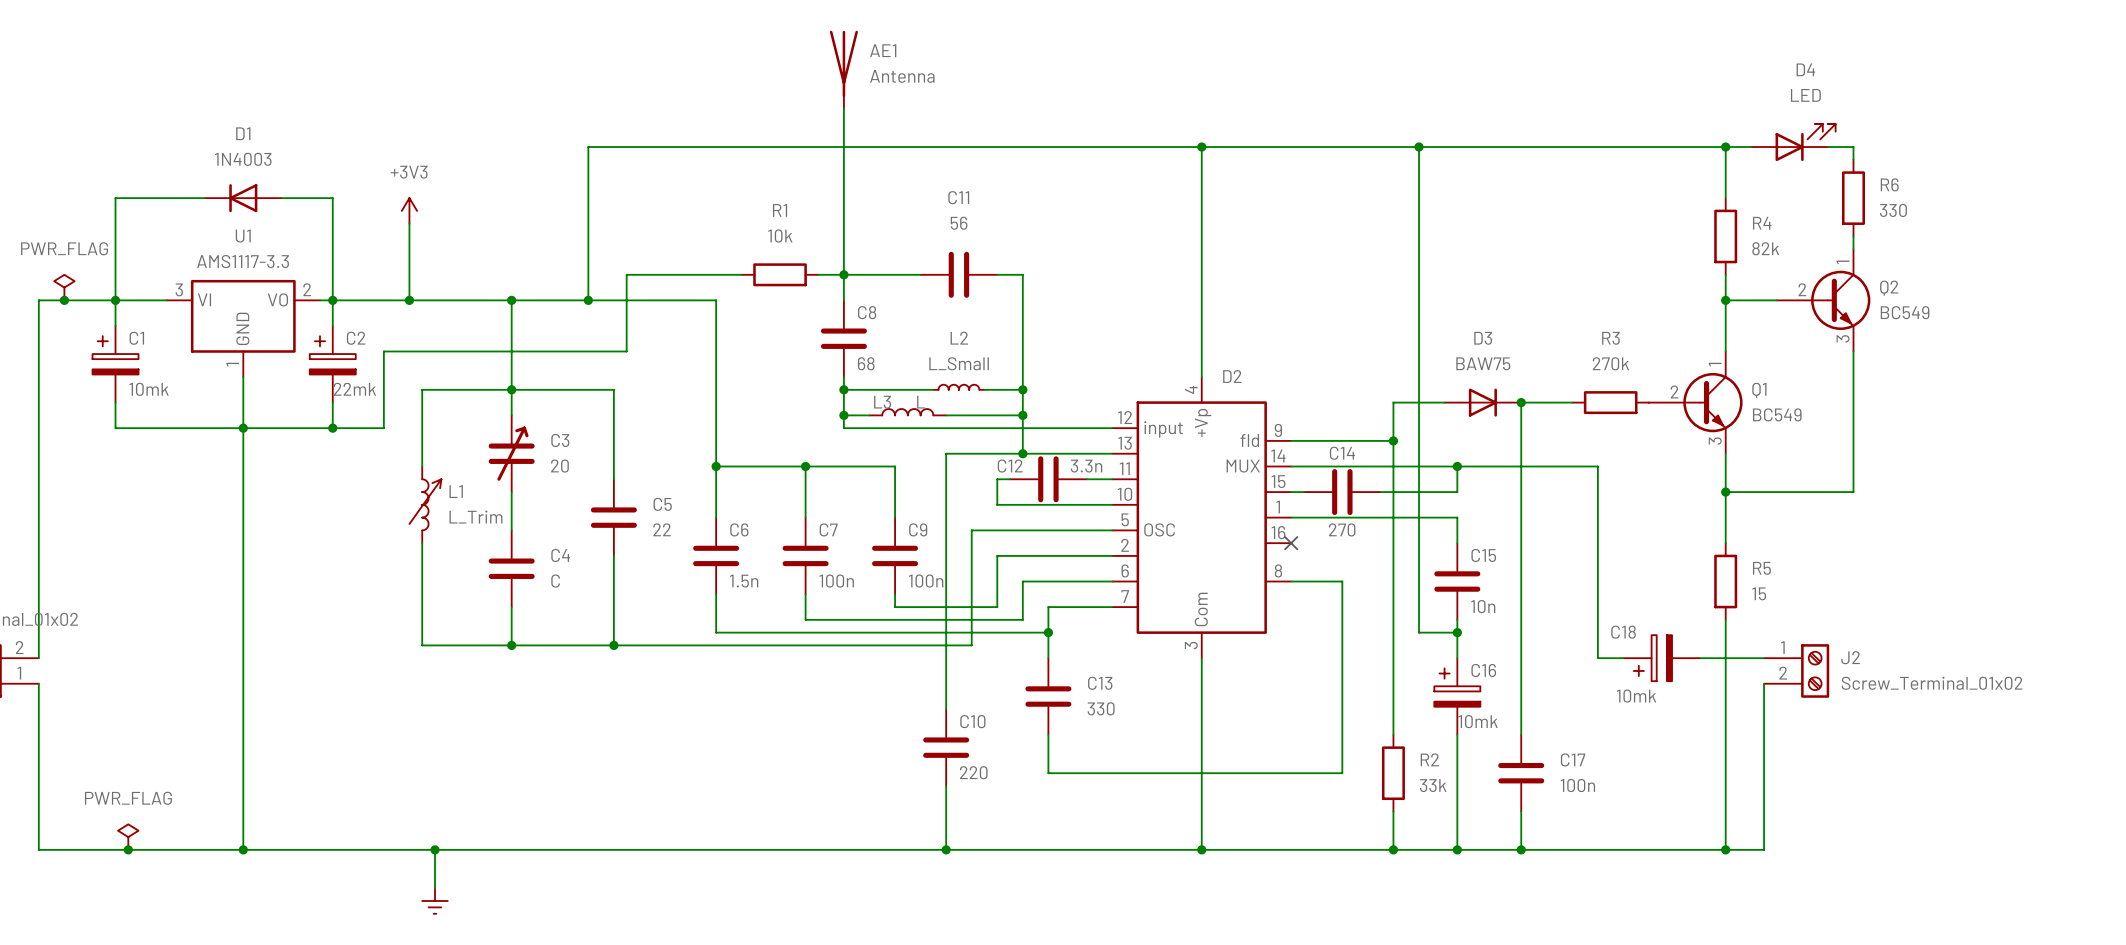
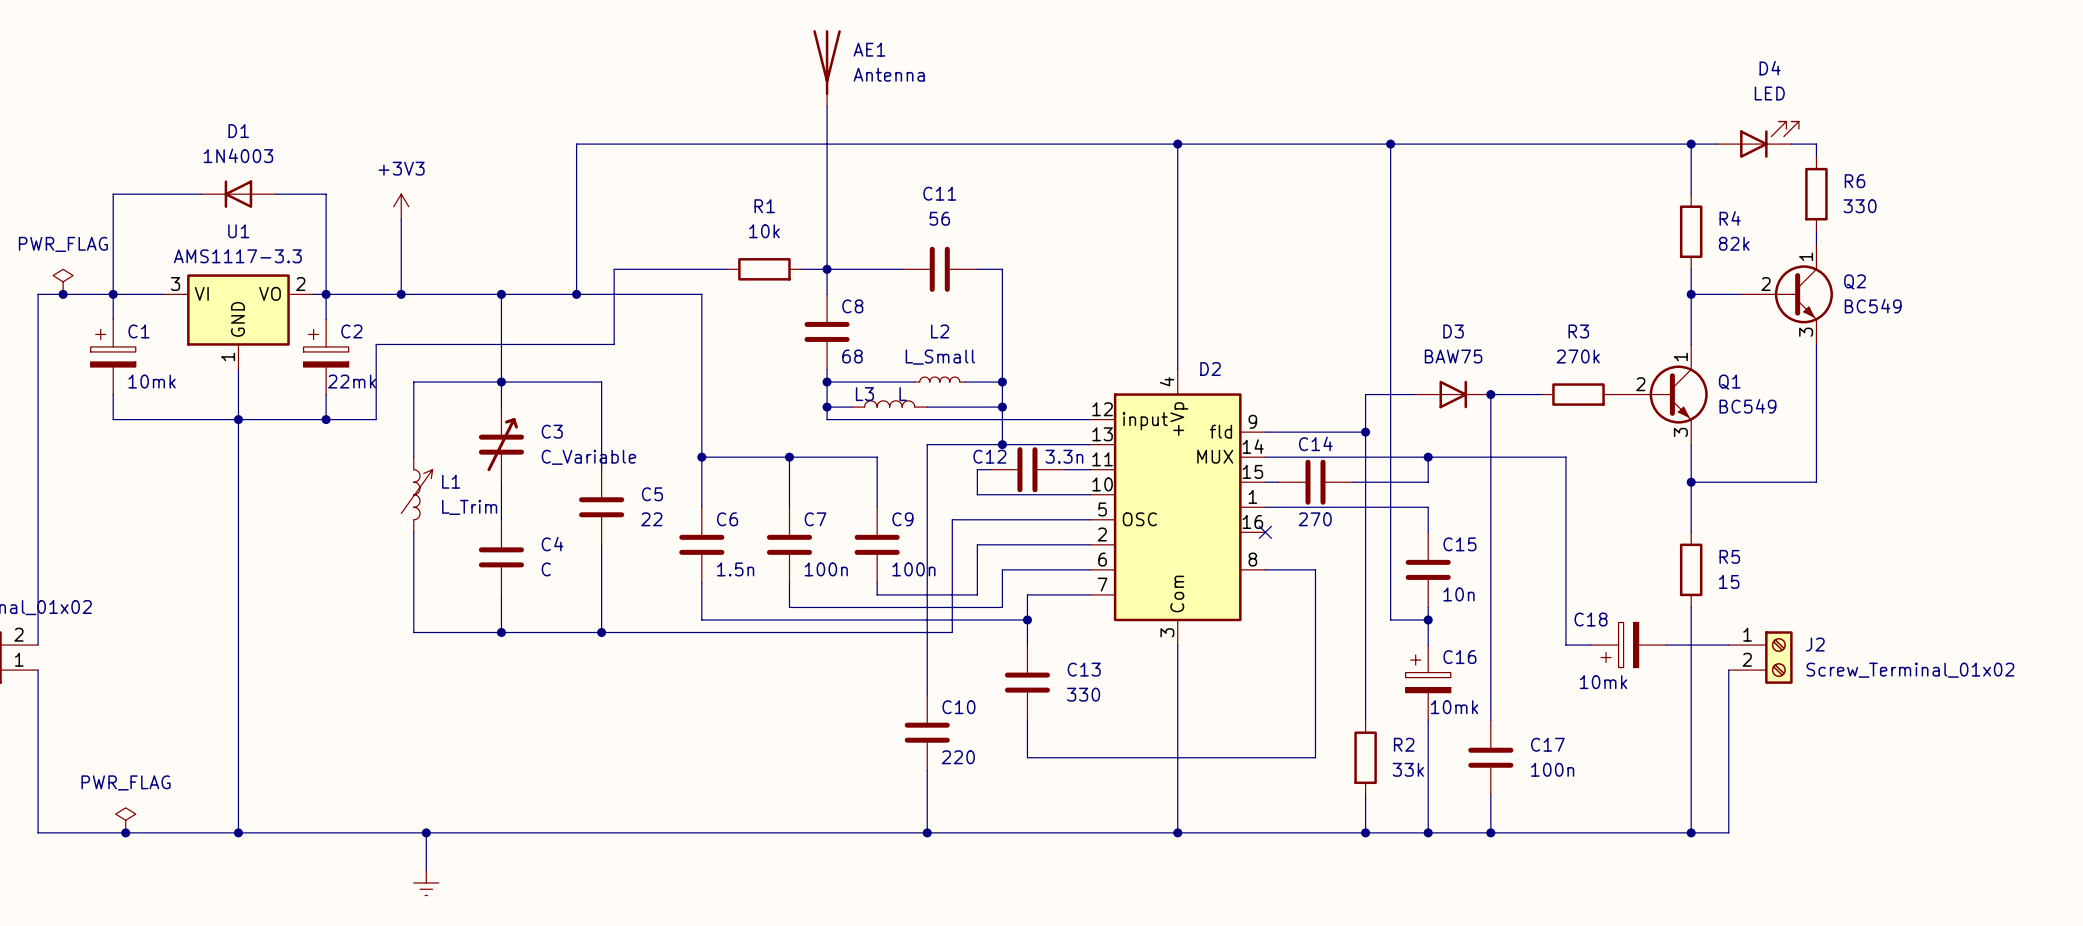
C3 value: 20 (559, 466) -> C_Variable (588, 457)

